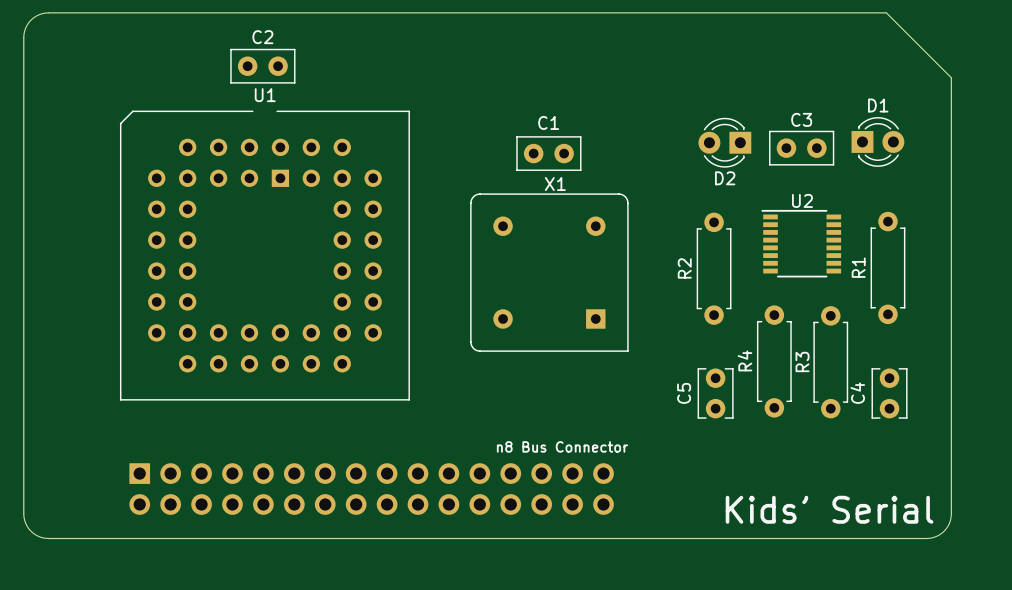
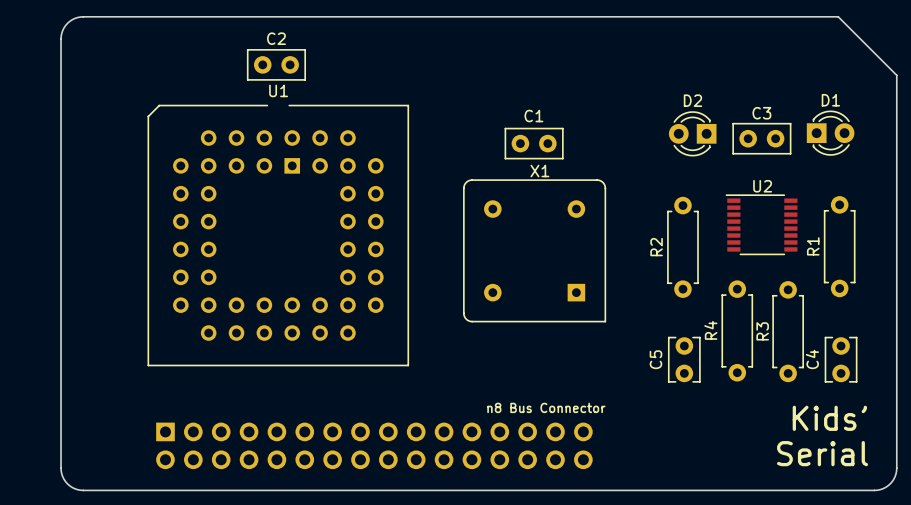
D2 name position: D2 (725, 178) -> D2 (692, 100)
text: none -> Kids’ (829, 418)
text: Kids’ Serial (829, 509) -> Serial (822, 453)

